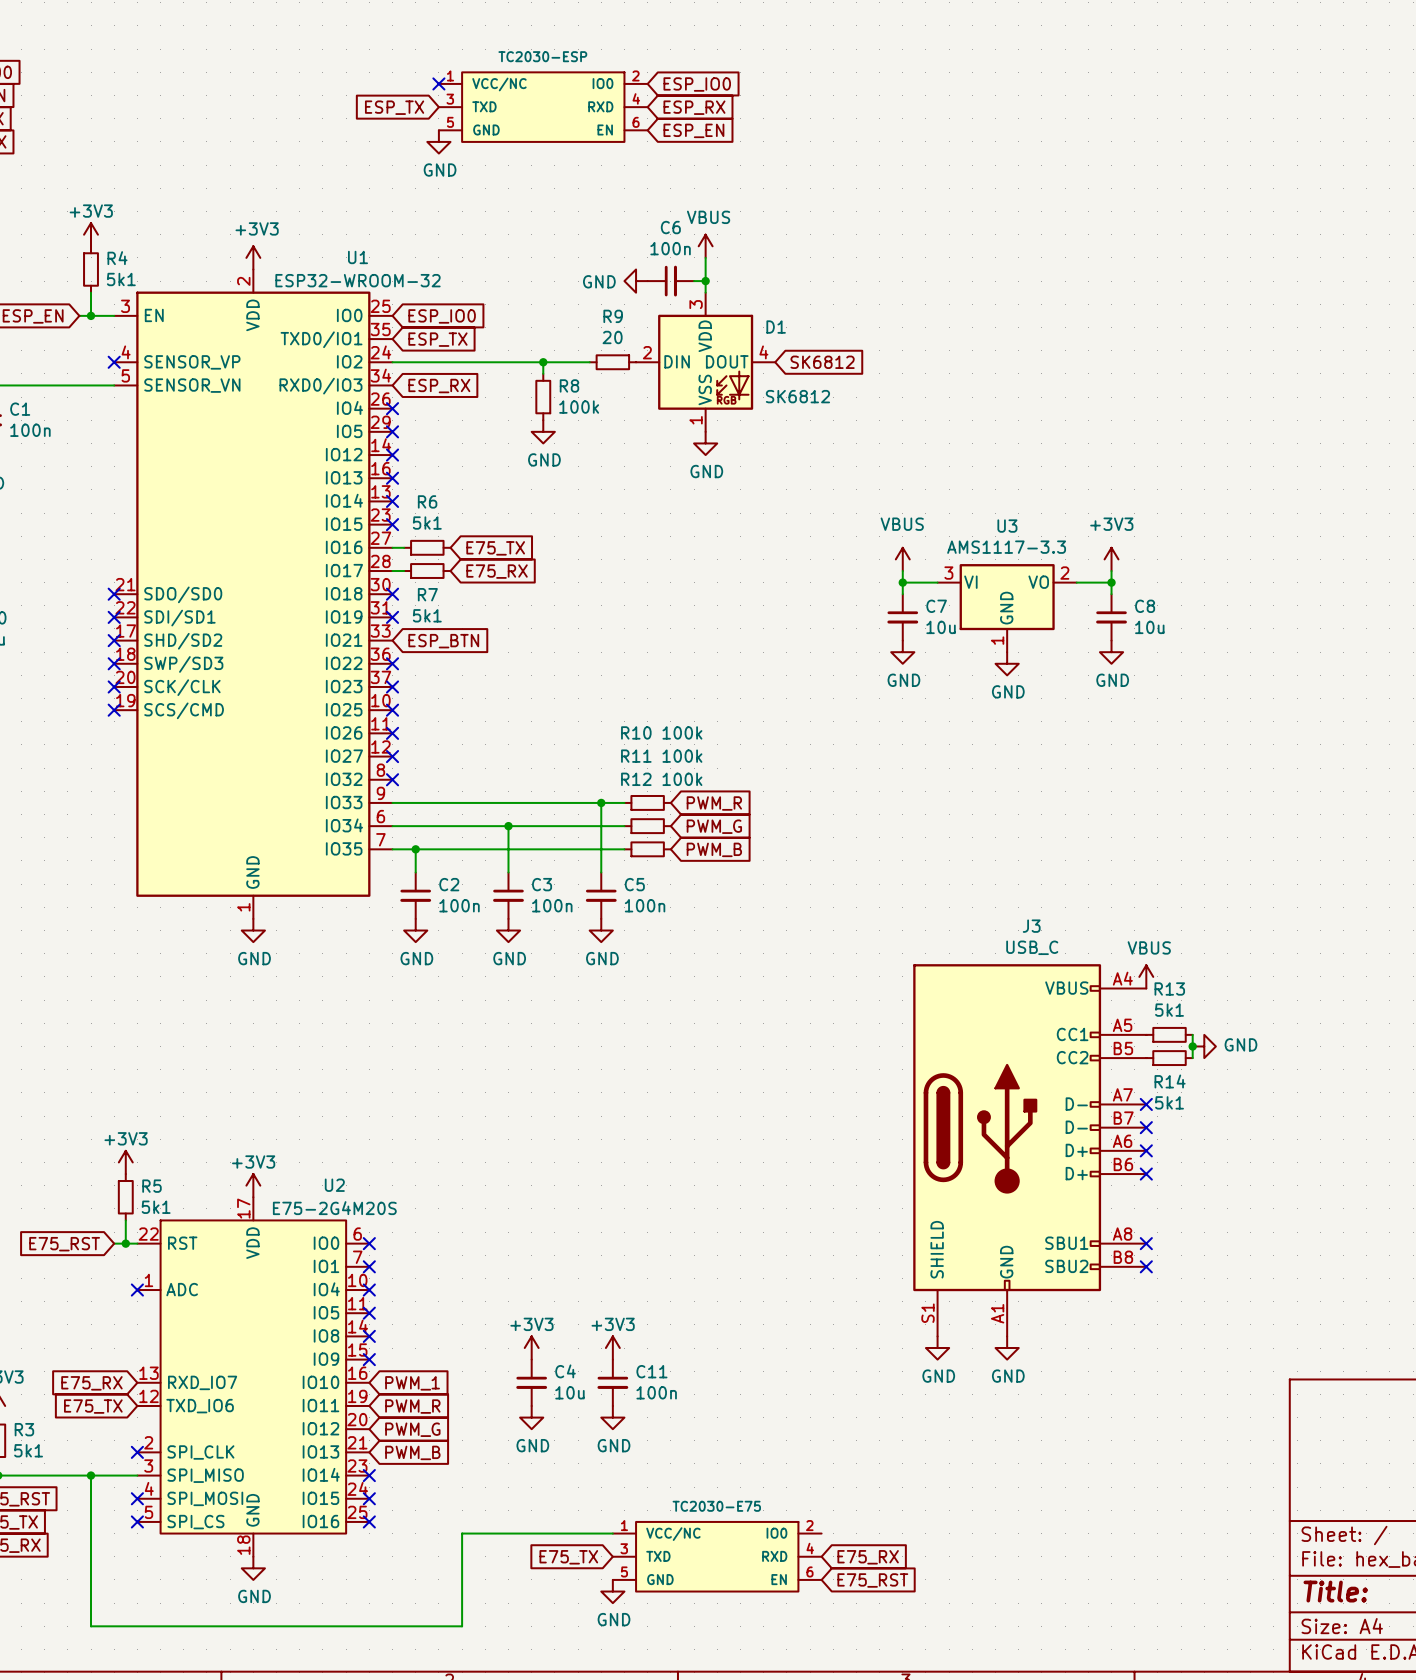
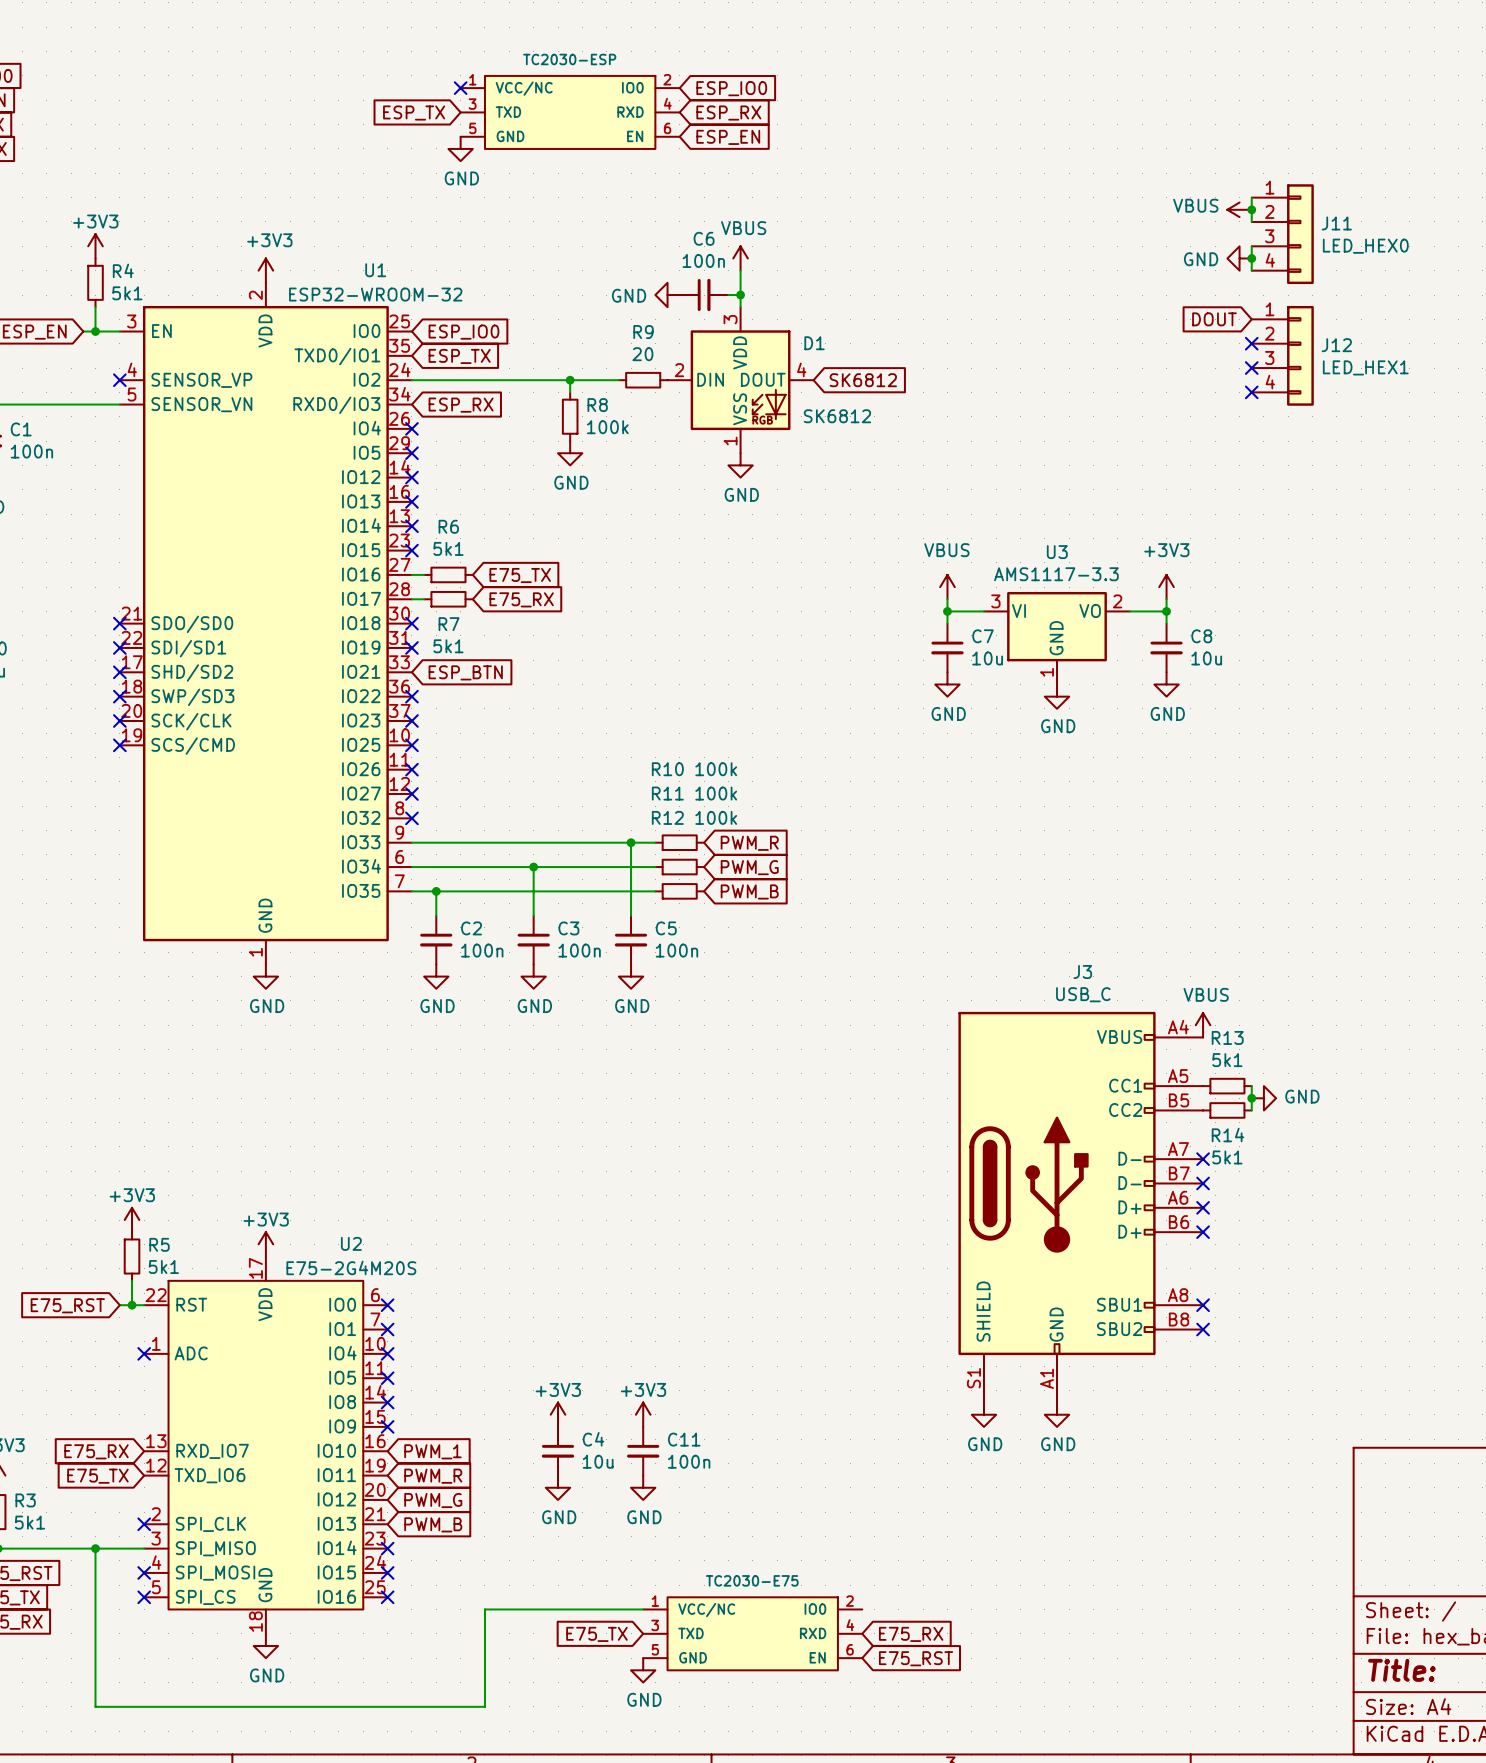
wire: none -> (1251, 197) (1251, 221)
power symbol: none -> VBUS (1239, 209)
junction: none -> (1251, 209)
J11: none -> LED_HEX0 (1282, 234)
wire: none -> (1251, 246) (1251, 270)
power symbol: none -> GND (1239, 258)
junction: none -> (1251, 258)
global label: none -> DOUT (1214, 319)
no-connect mark: none -> (1251, 343)
J12: none -> LED_HEX1 (1282, 355)
no-connect mark: none -> (1251, 368)
no-connect mark: none -> (1251, 392)

